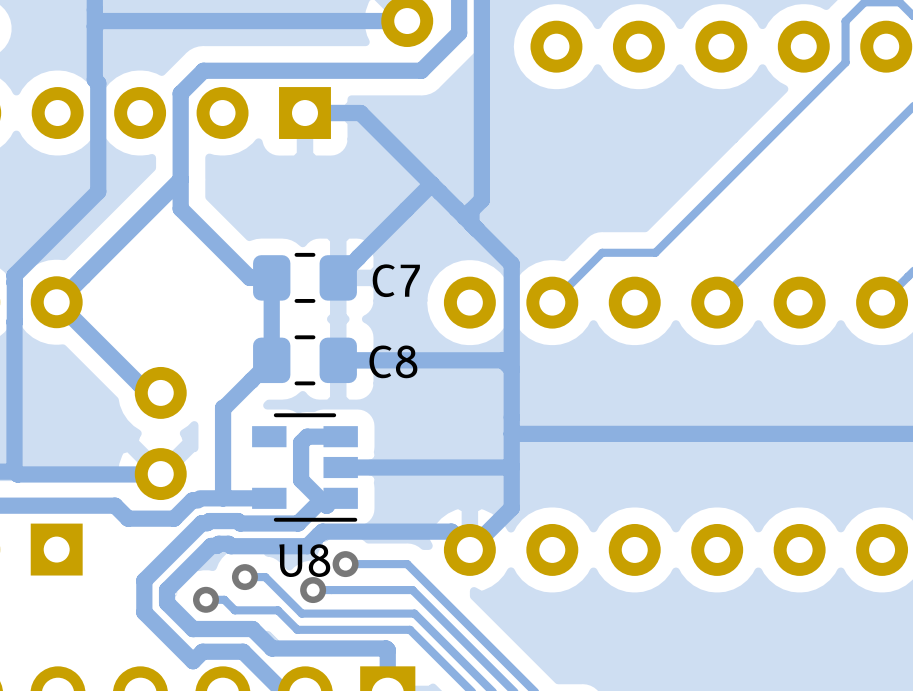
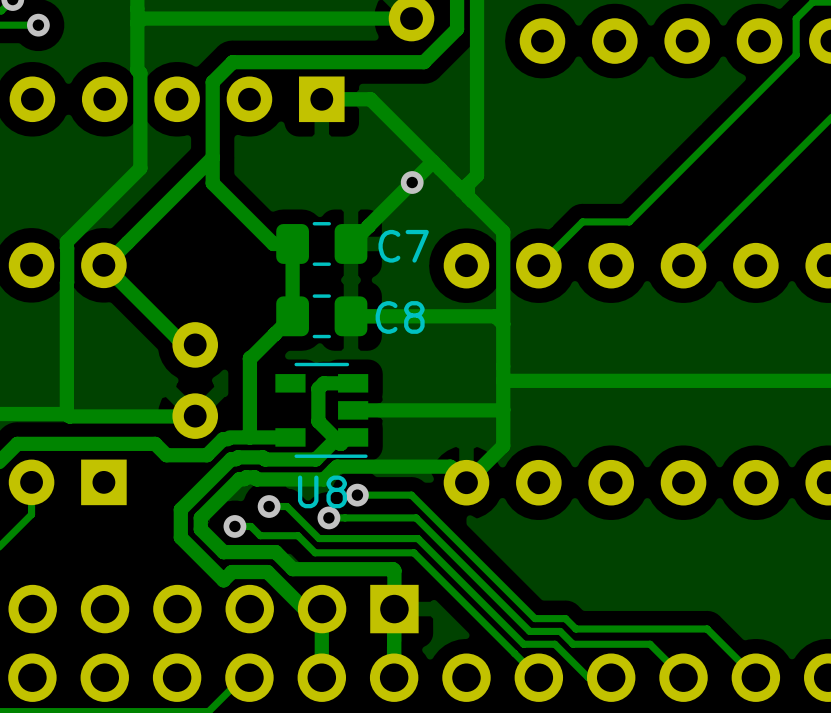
via: none -> (412, 182)

